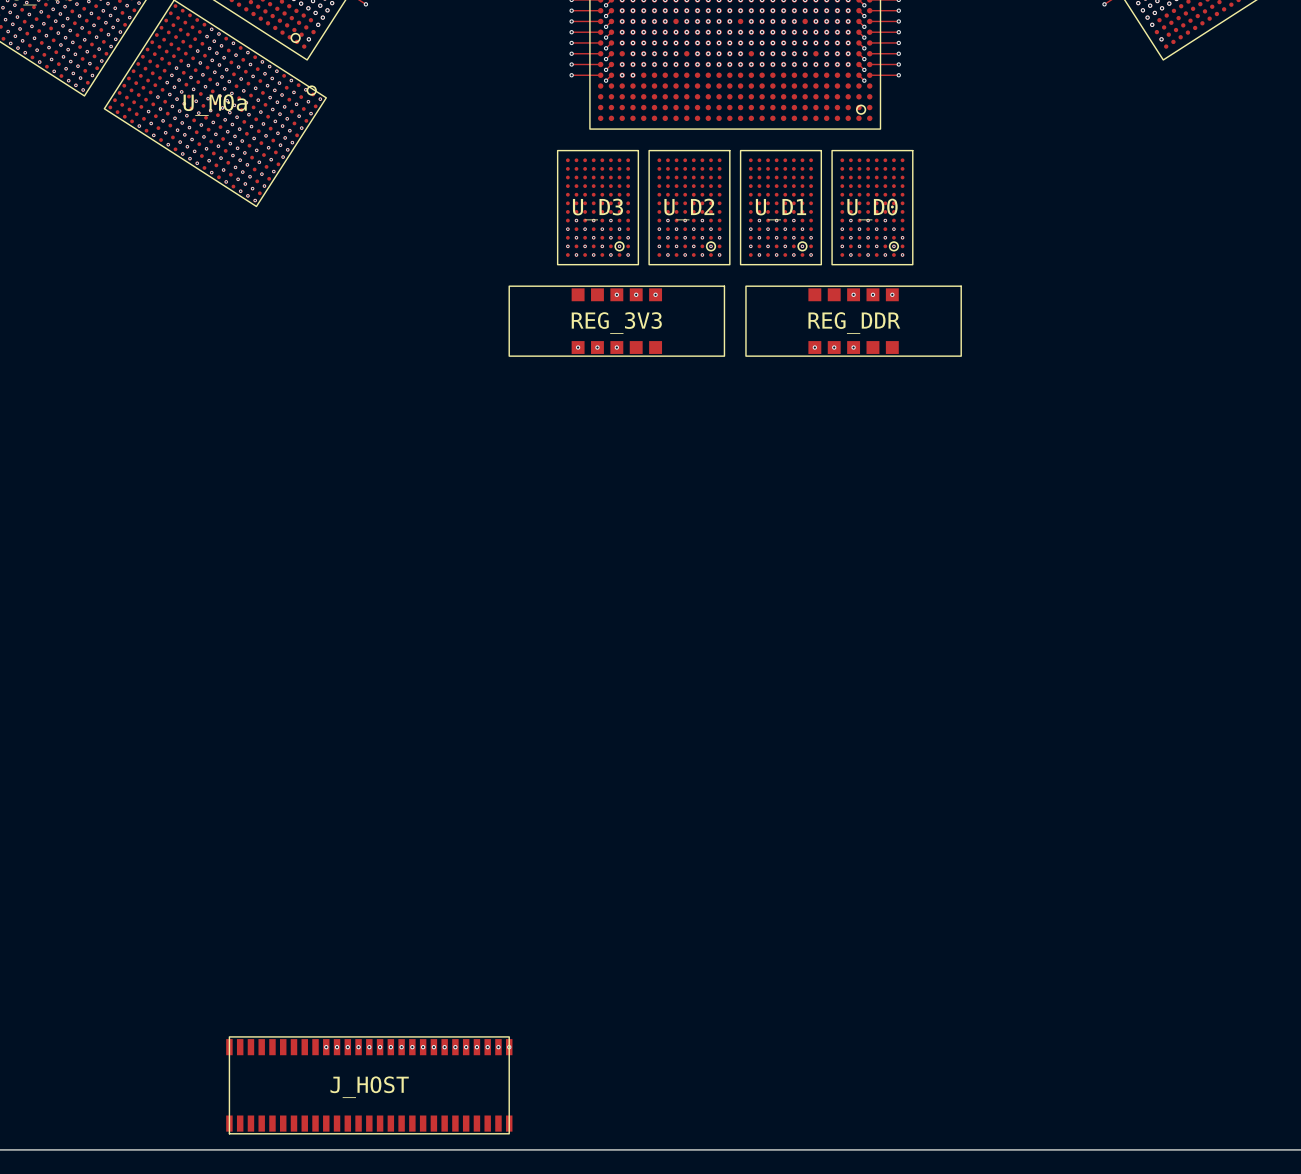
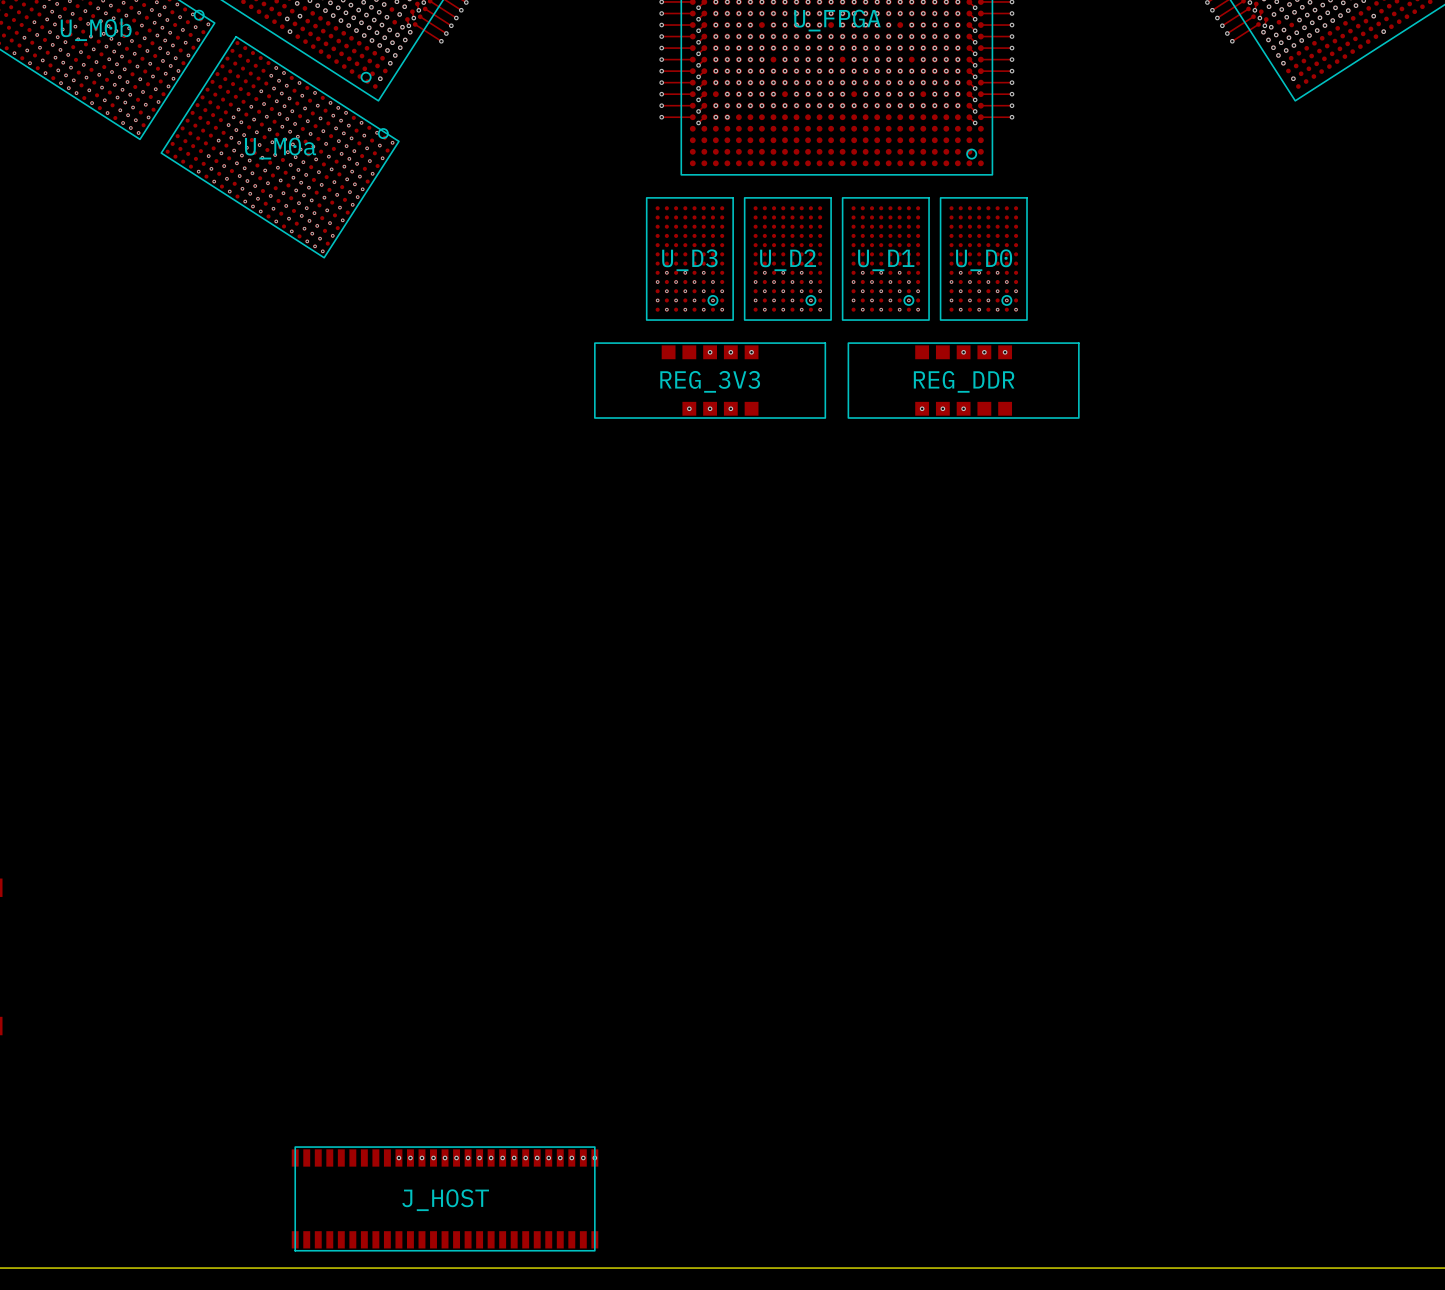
REG_3V3 footprint: [508, 285, 725, 357] -> [594, 342, 826, 419]
via position: (578, 347) -> (730, 408)

